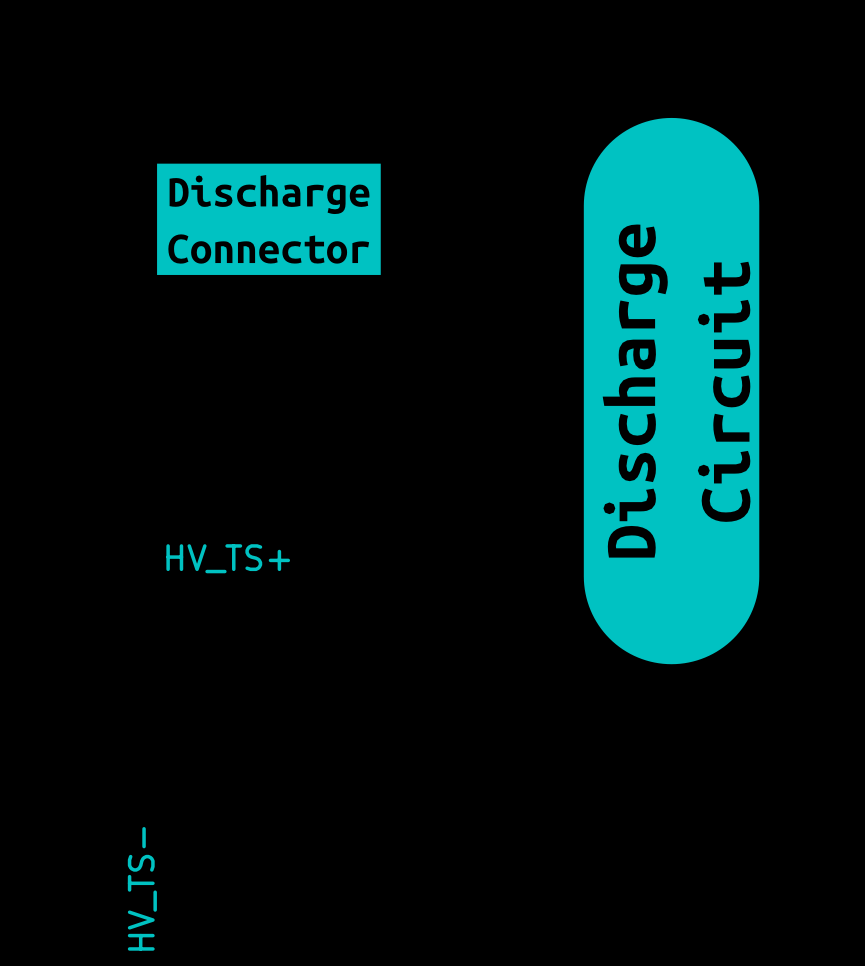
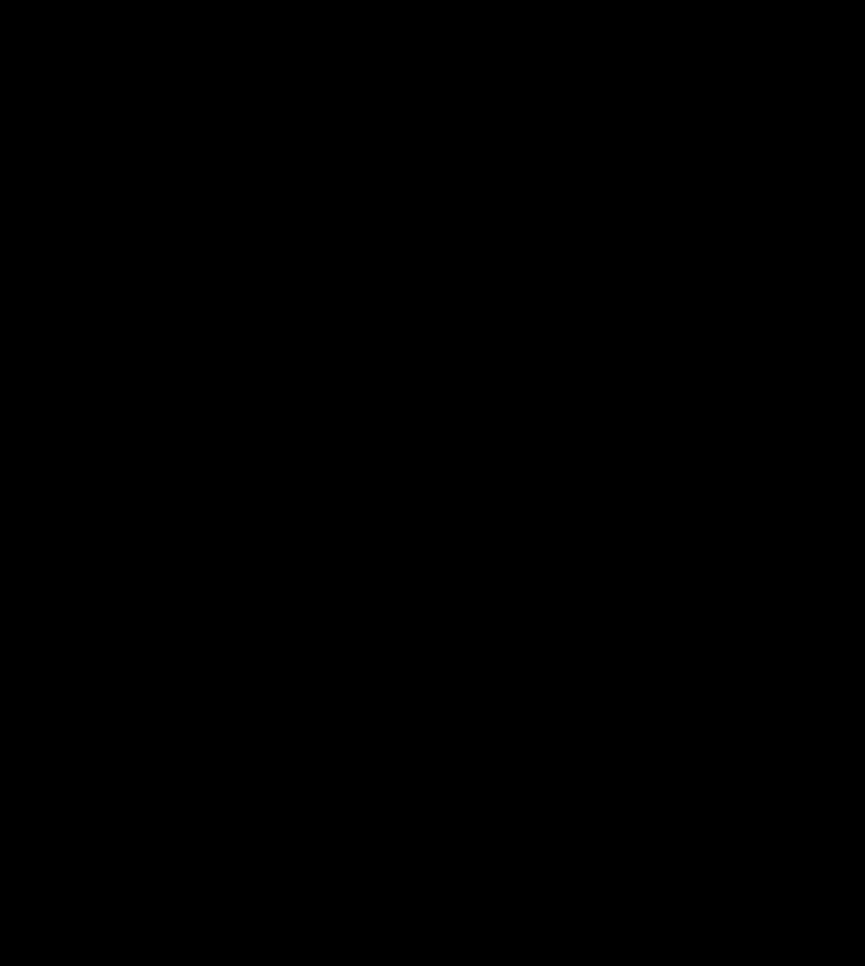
drawing: [583, 117, 760, 665] -> none
drawing: [157, 163, 381, 275] -> none
text: HV_TS+ (228, 558) -> none
text: HV_TS- (142, 888) -> none

